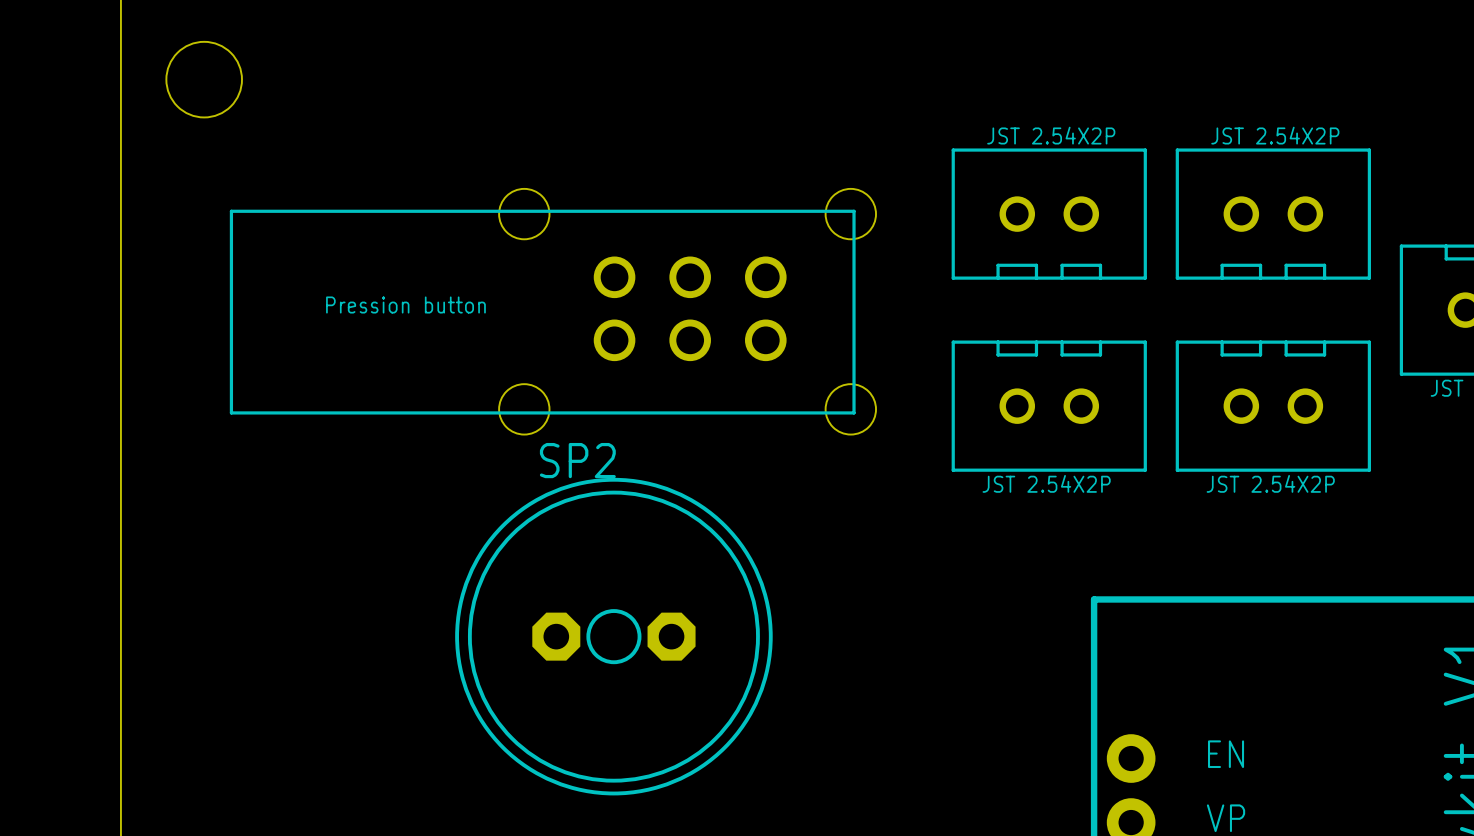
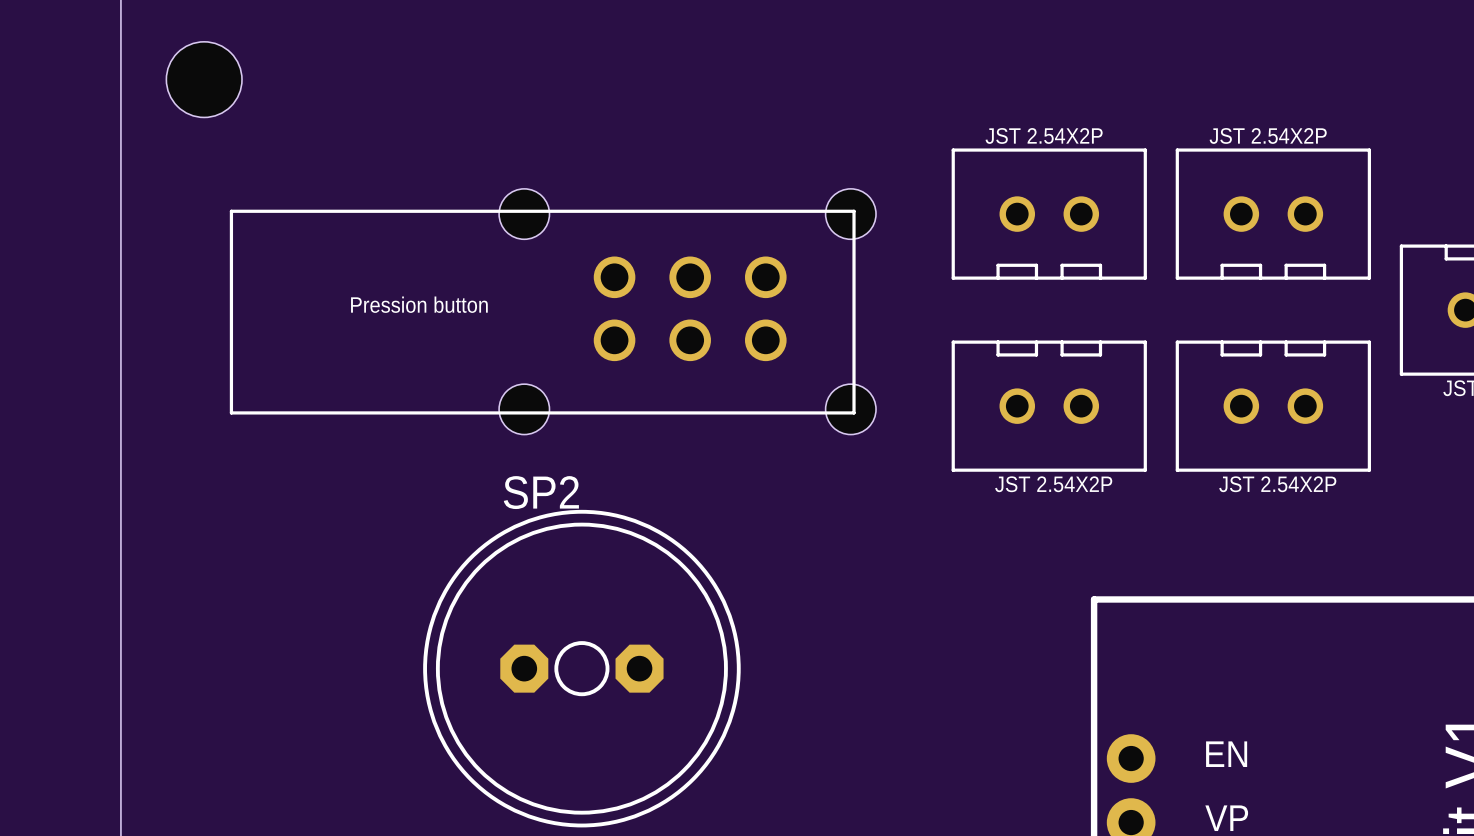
SP2 position: (613, 636) -> (581, 668)

